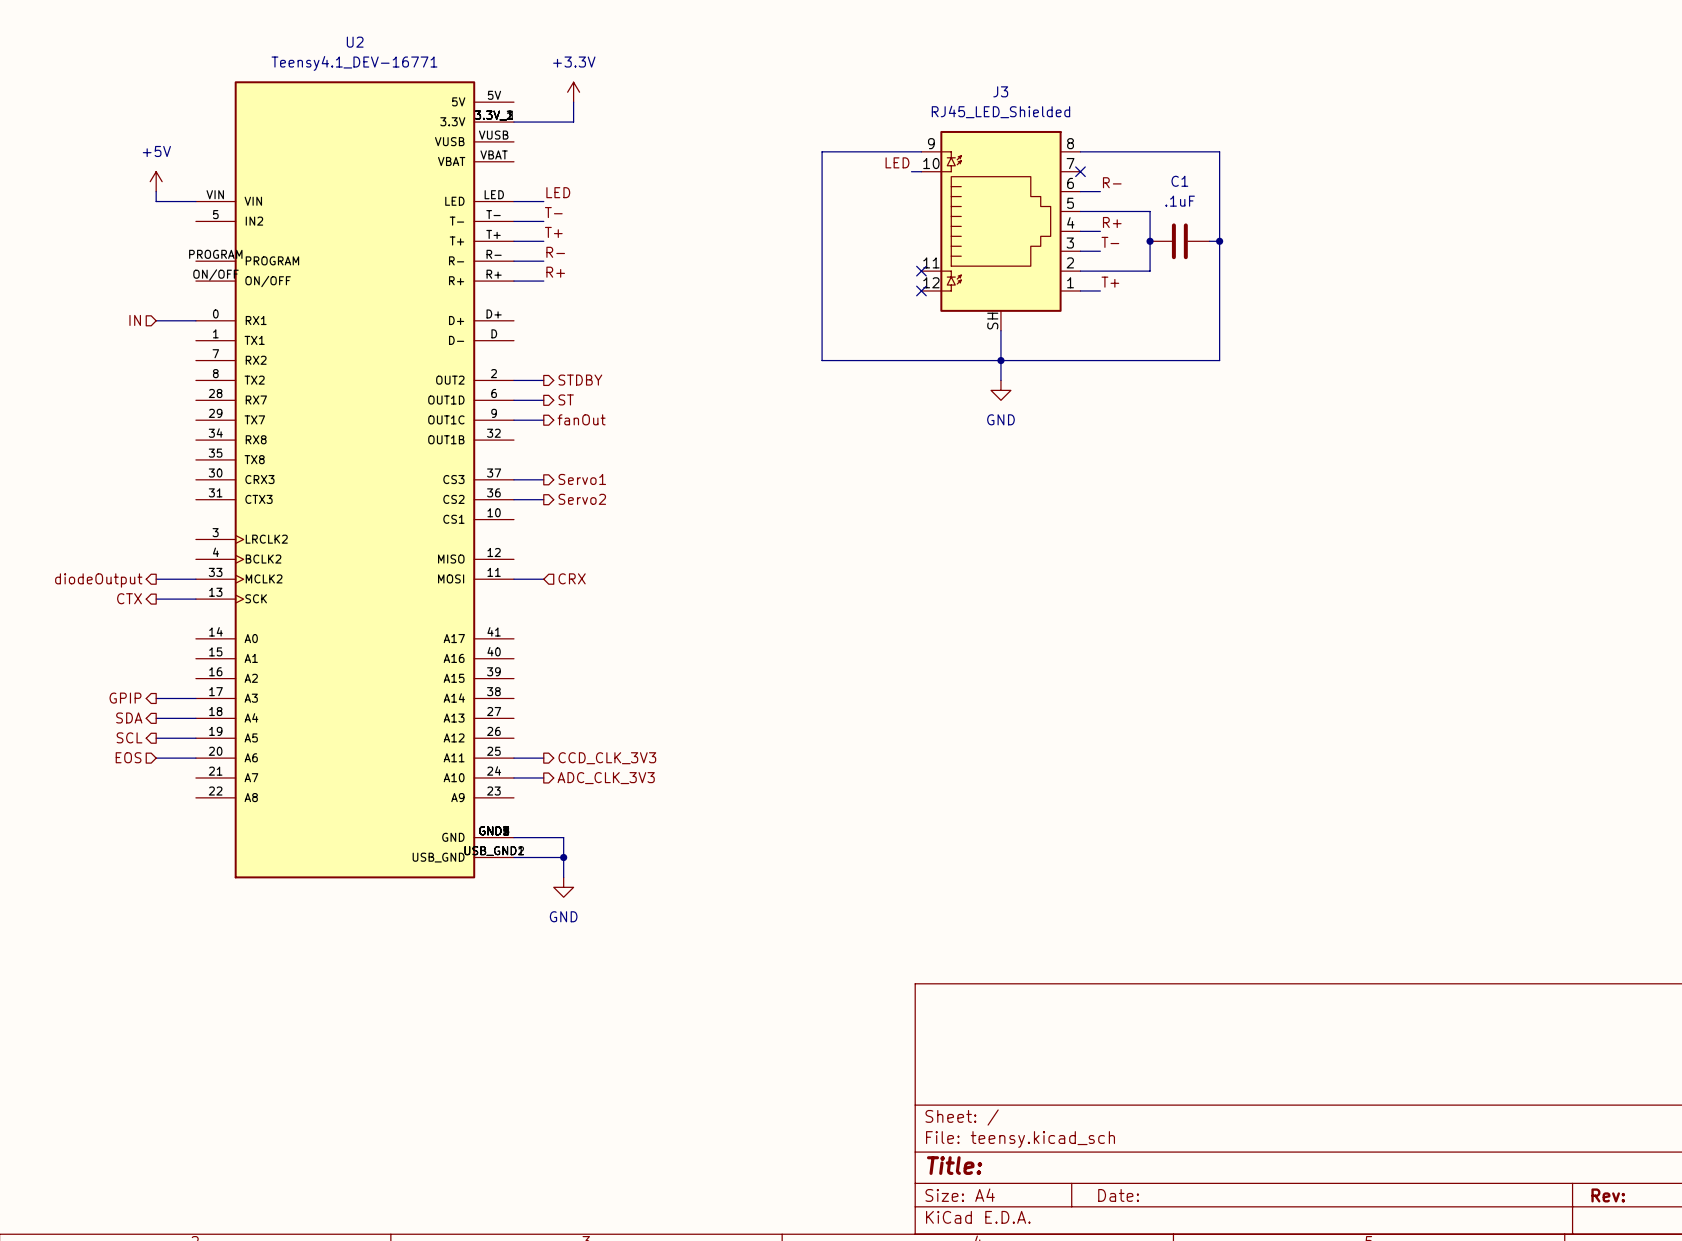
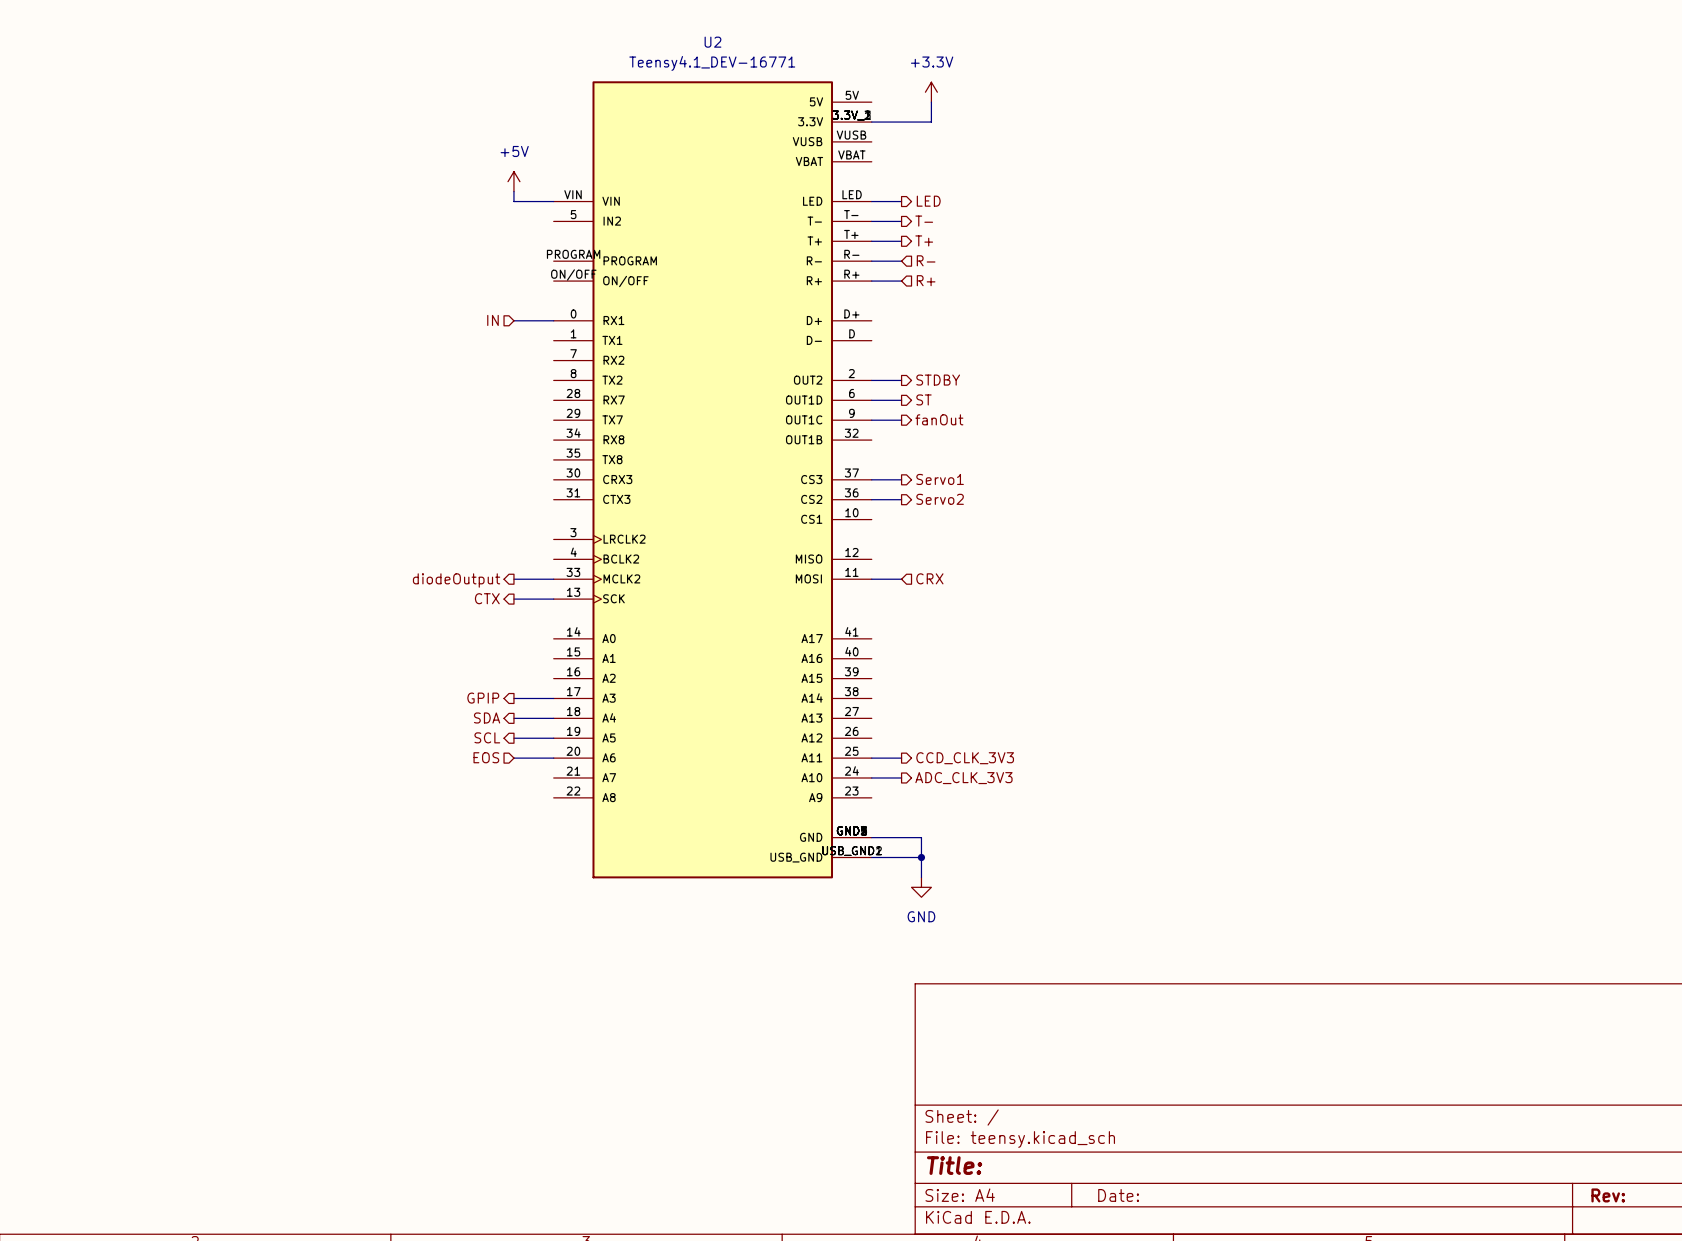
power symbol: +3.3V (573, 92) -> none
power symbol: none -> +3.3V (931, 92)
wire: (573, 102) (573, 122) (513, 122) -> none
wire: none -> (931, 102) (931, 122) (871, 122)
wire: (921, 151) (822, 151) (822, 360) (1219, 360) (1219, 151) (1080, 151) -> none
label: LED (897, 162) -> none
wire: (911, 171) (921, 171) -> none
no-connect mark: (1080, 171) -> none
power symbol: +5V (156, 181) -> none
power symbol: none -> +5V (513, 181)
label: R- (1112, 182) -> none
wire: (156, 191) (156, 201) (195, 201) -> none
wire: none -> (513, 191) (513, 201)
wire: (1080, 191) (1100, 191) -> none
label: LED (558, 192) -> none
wire: none -> (543, 201) (553, 201)
wire: none -> (871, 201) (901, 201)
hierarchical label: none -> LED (928, 201)
wire: (1080, 211) (1150, 211) (1150, 271) (1080, 271) -> none
label: T- (553, 212) -> none
wire: (513, 221) (543, 221) -> none
wire: none -> (871, 221) (901, 221)
hierarchical label: none -> T- (924, 221)
label: R+ (1112, 222) -> none
J3: RJ45_LED_Shielded (1000, 230) -> none
wire: (1080, 231) (1100, 231) -> none
label: T+ (553, 232) -> none
hierarchical label: none -> T+ (924, 240)
wire: (513, 241) (543, 241) -> none
wire: none -> (871, 241) (901, 241)
junction: (1150, 241) -> none
C1: .1uF (1179, 241) -> none
wire: (1209, 241) (1219, 241) -> none
junction: (1219, 241) -> none
label: T- (1110, 242) -> none
wire: (1080, 251) (1100, 251) -> none
label: R- (555, 252) -> none
hierarchical label: none -> R- (926, 260)
wire: (513, 261) (543, 261) -> none
wire: none -> (871, 261) (901, 261)
no-connect mark: (921, 271) -> none
label: R+ (555, 272) -> none
hierarchical label: none -> R+ (926, 280)
wire: (513, 281) (543, 281) -> none
wire: none -> (871, 281) (901, 281)
label: T+ (1110, 282) -> none
no-connect mark: (921, 290) -> none
wire: (1080, 290) (1100, 290) -> none
hierarchical label: IN (135, 320) -> none
wire: (156, 320) (195, 320) -> none
hierarchical label: none -> IN (492, 320)
wire: none -> (513, 320) (553, 320)
wire: (1000, 330) (1000, 380) -> none
junction: (1000, 360) -> none
wire: (513, 380) (543, 380) -> none
hierarchical label: STDBY (580, 380) -> none
wire: none -> (871, 380) (901, 380)
hierarchical label: none -> STDBY (938, 380)
power symbol: GND (1000, 390) -> none
hierarchical label: ST (566, 399) -> none
hierarchical label: none -> ST (923, 399)
wire: (513, 400) (543, 400) -> none
wire: none -> (871, 400) (901, 400)
hierarchical label: fanOut (581, 419) -> none
hierarchical label: none -> fanOut (939, 419)
wire: (513, 420) (543, 420) -> none
wire: none -> (871, 420) (901, 420)
U2 position: (354, 479) -> (712, 479)
wire: (513, 479) (543, 479) -> none
hierarchical label: Servo1 (582, 479) -> none
wire: none -> (871, 479) (901, 479)
hierarchical label: none -> Servo1 (940, 479)
wire: (513, 499) (543, 499) -> none
hierarchical label: Servo2 (582, 499) -> none
wire: none -> (871, 499) (901, 499)
hierarchical label: none -> Servo2 (940, 499)
hierarchical label: CRX (572, 578) -> none
hierarchical label: none -> CRX (929, 578)
wire: (156, 579) (195, 579) -> none
wire: none -> (543, 579) (553, 579)
wire: none -> (871, 579) (901, 579)
hierarchical label: diodeOutput (98, 580) -> none
hierarchical label: none -> diodeOutput (456, 580)
hierarchical label: CTX (129, 598) -> none
hierarchical label: none -> CTX (487, 598)
wire: (156, 599) (195, 599) -> none
wire: none -> (513, 599) (553, 599)
hierarchical label: GPIP (125, 698) -> none
wire: (156, 698) (195, 698) -> none
hierarchical label: none -> GPIP (483, 698)
wire: none -> (513, 698) (553, 698)
hierarchical label: SDA (129, 717) -> none
hierarchical label: none -> SDA (487, 717)
wire: (156, 718) (195, 718) -> none
wire: none -> (513, 718) (553, 718)
hierarchical label: SCL (129, 737) -> none
hierarchical label: none -> SCL (487, 737)
wire: (156, 738) (195, 738) -> none
wire: none -> (513, 738) (553, 738)
hierarchical label: EOS (128, 757) -> none
hierarchical label: none -> EOS (486, 757)
wire: (156, 758) (195, 758) -> none
wire: none -> (543, 758) (553, 758)
hierarchical label: CCD_CLK_3V3 (607, 758) -> none
wire: none -> (871, 758) (901, 758)
hierarchical label: none -> CCD_CLK_3V3 (965, 758)
wire: (513, 777) (543, 777) -> none
wire: none -> (871, 777) (901, 777)
hierarchical label: ADC_CLK_3V3 (606, 778) -> none
hierarchical label: none -> ADC_CLK_3V3 (963, 778)
wire: (513, 837) (563, 837) (563, 877) -> none
wire: none -> (871, 837) (921, 837) (921, 877)
wire: (513, 857) (563, 857) -> none
junction: (563, 857) -> none
wire: none -> (871, 857) (921, 857)
junction: none -> (921, 857)
power symbol: GND (563, 887) -> none
power symbol: none -> GND (921, 887)

